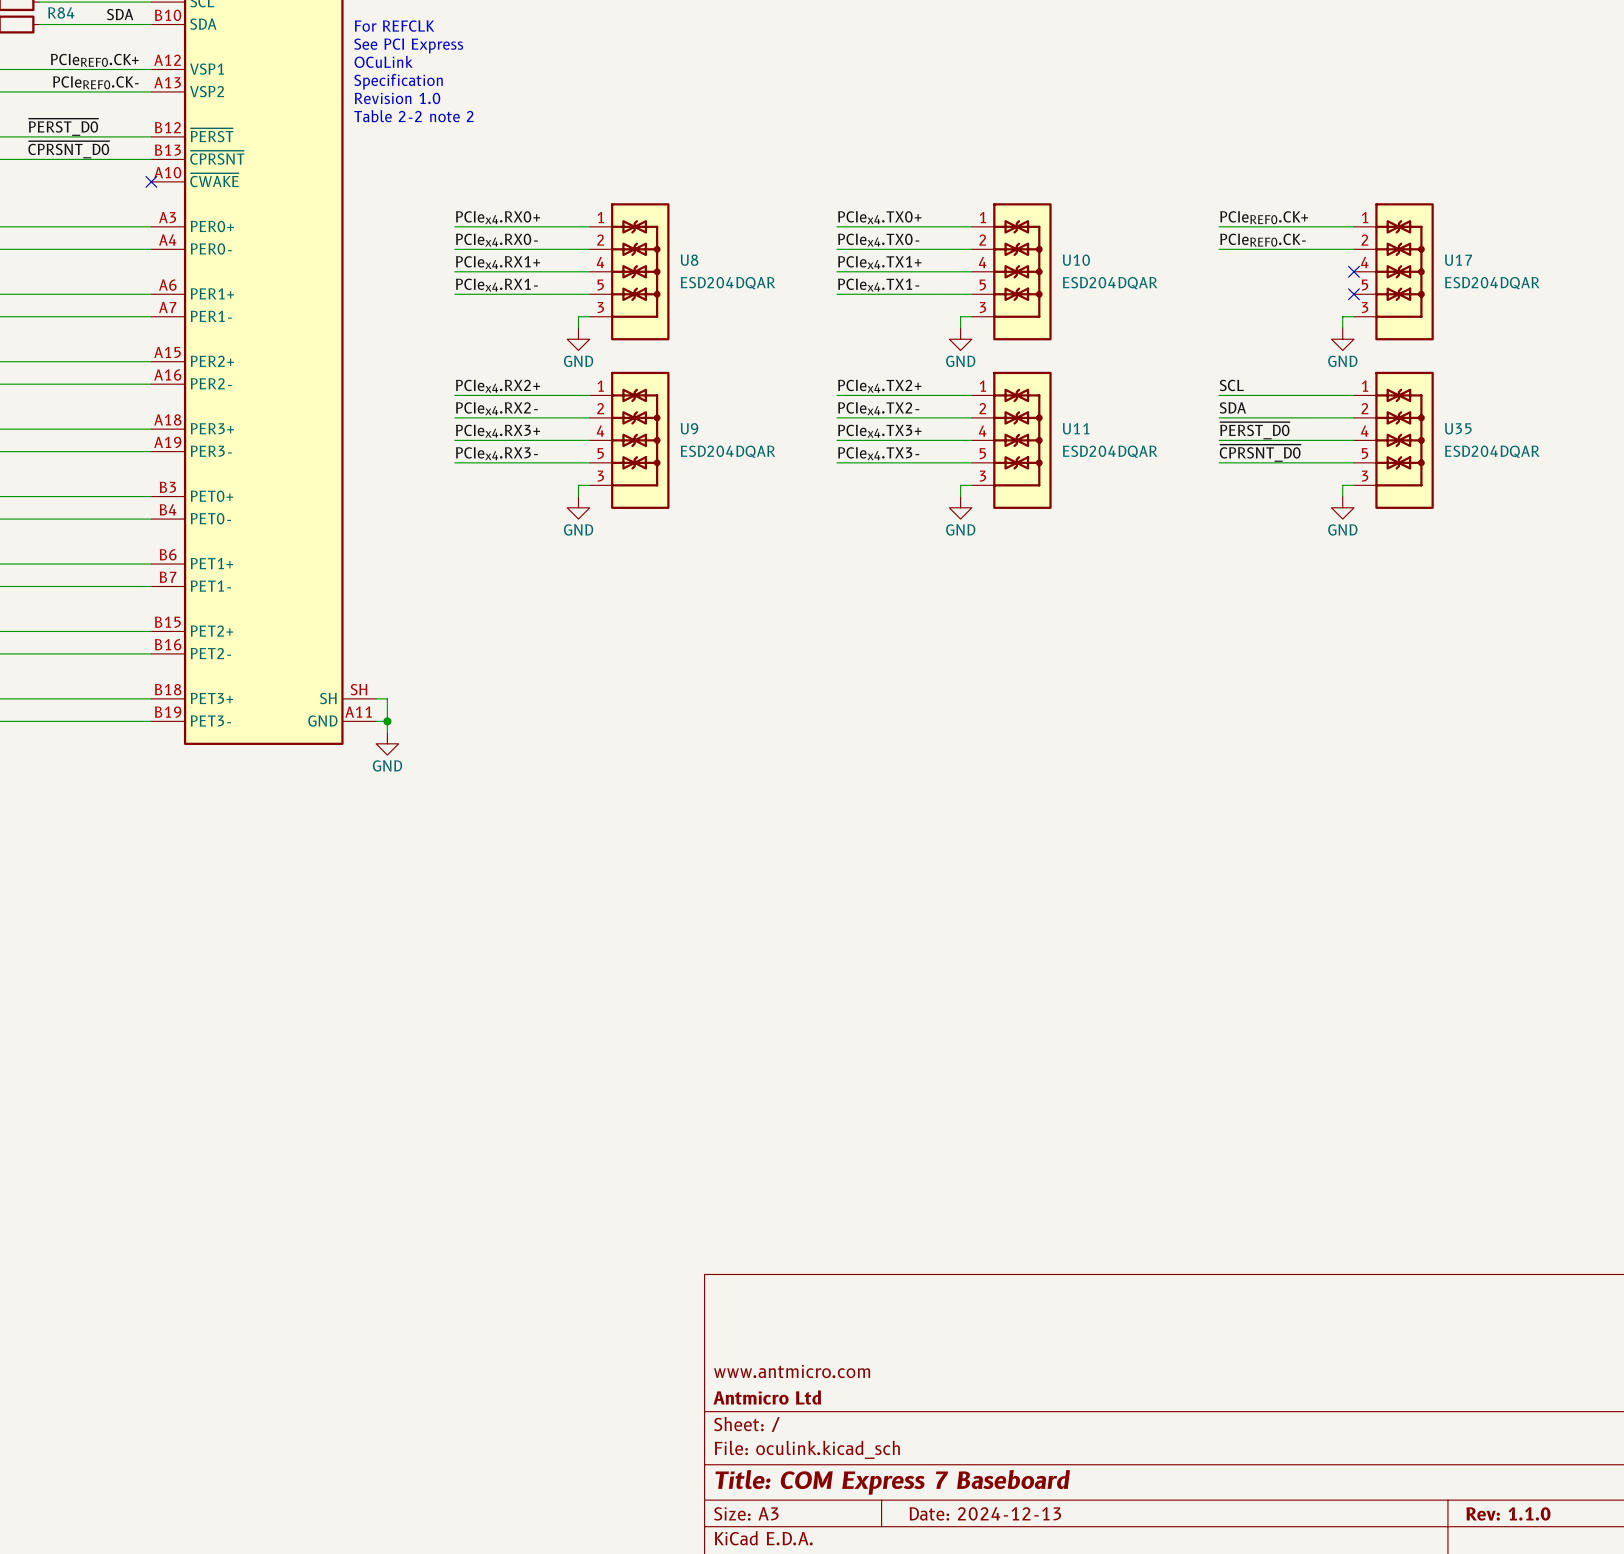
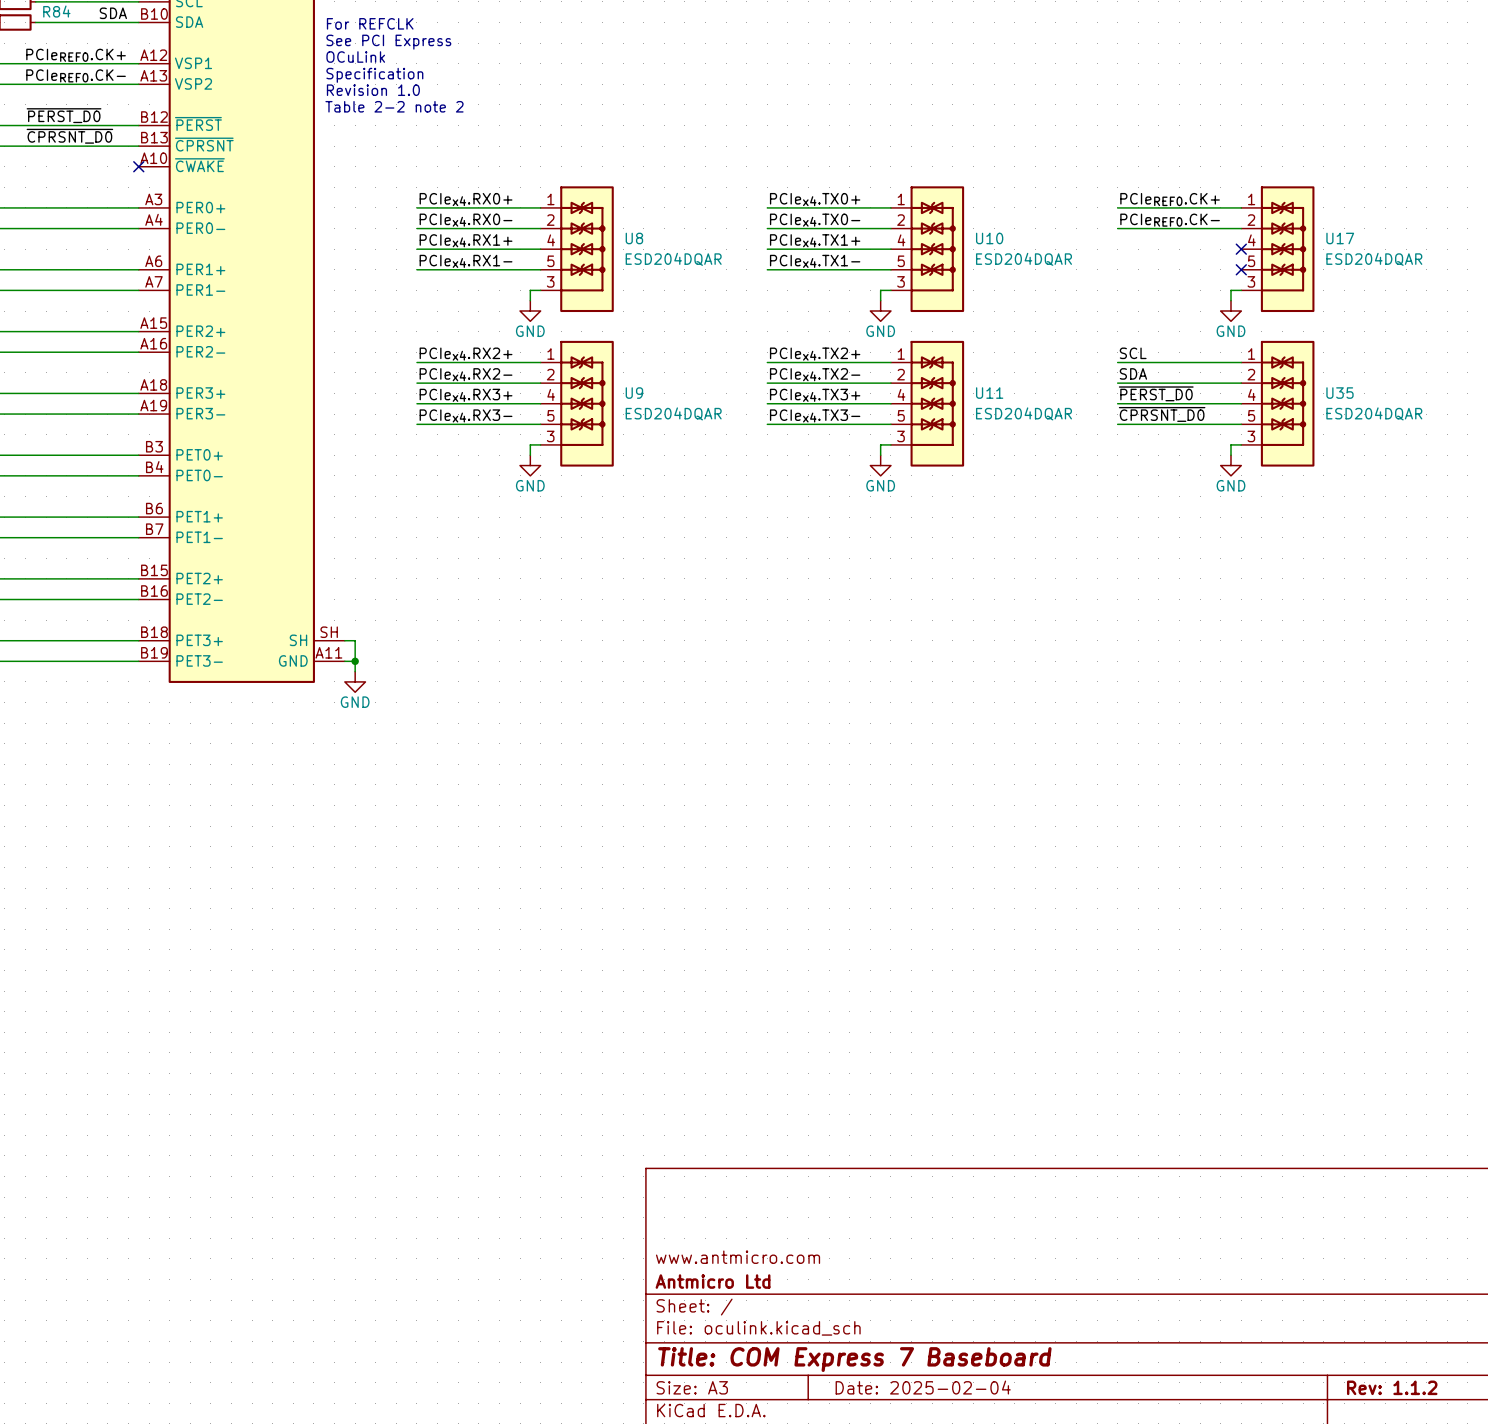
title block: Date: 2024-12-13 (985, 1513) -> Date: 2025-02-04 (923, 1387)
title block: Rev: 1.1.0 (1508, 1513) -> Rev: 1.1.2 (1392, 1387)

